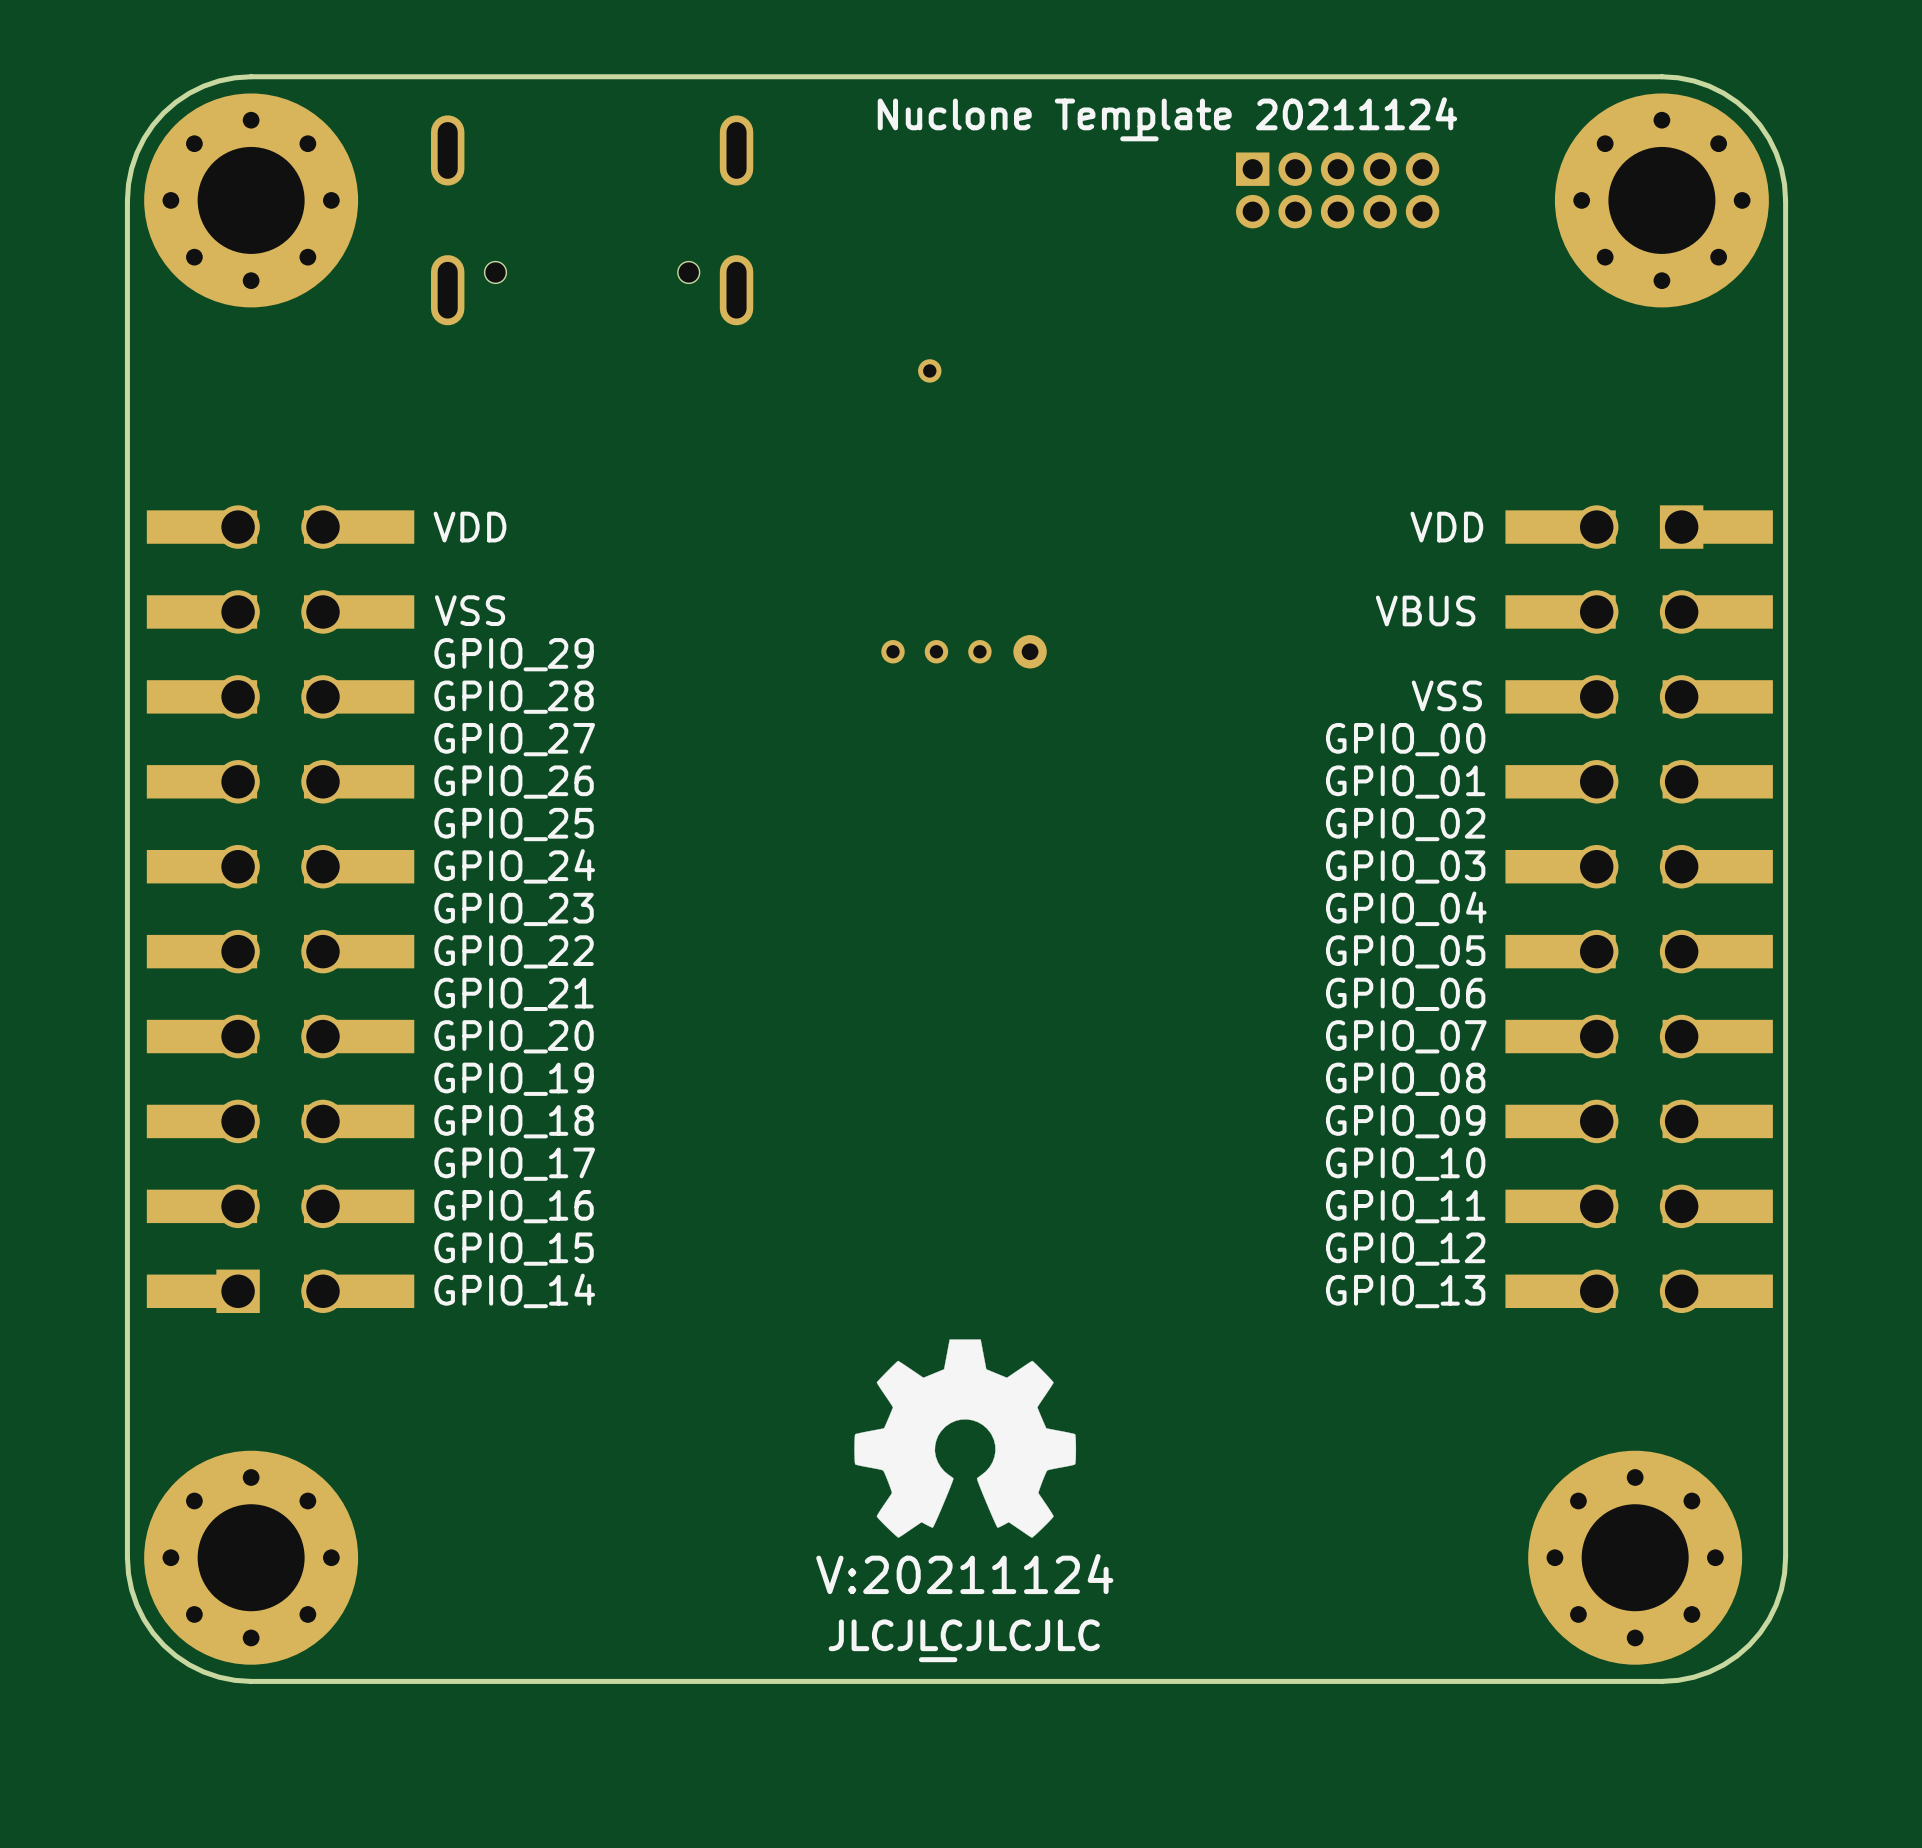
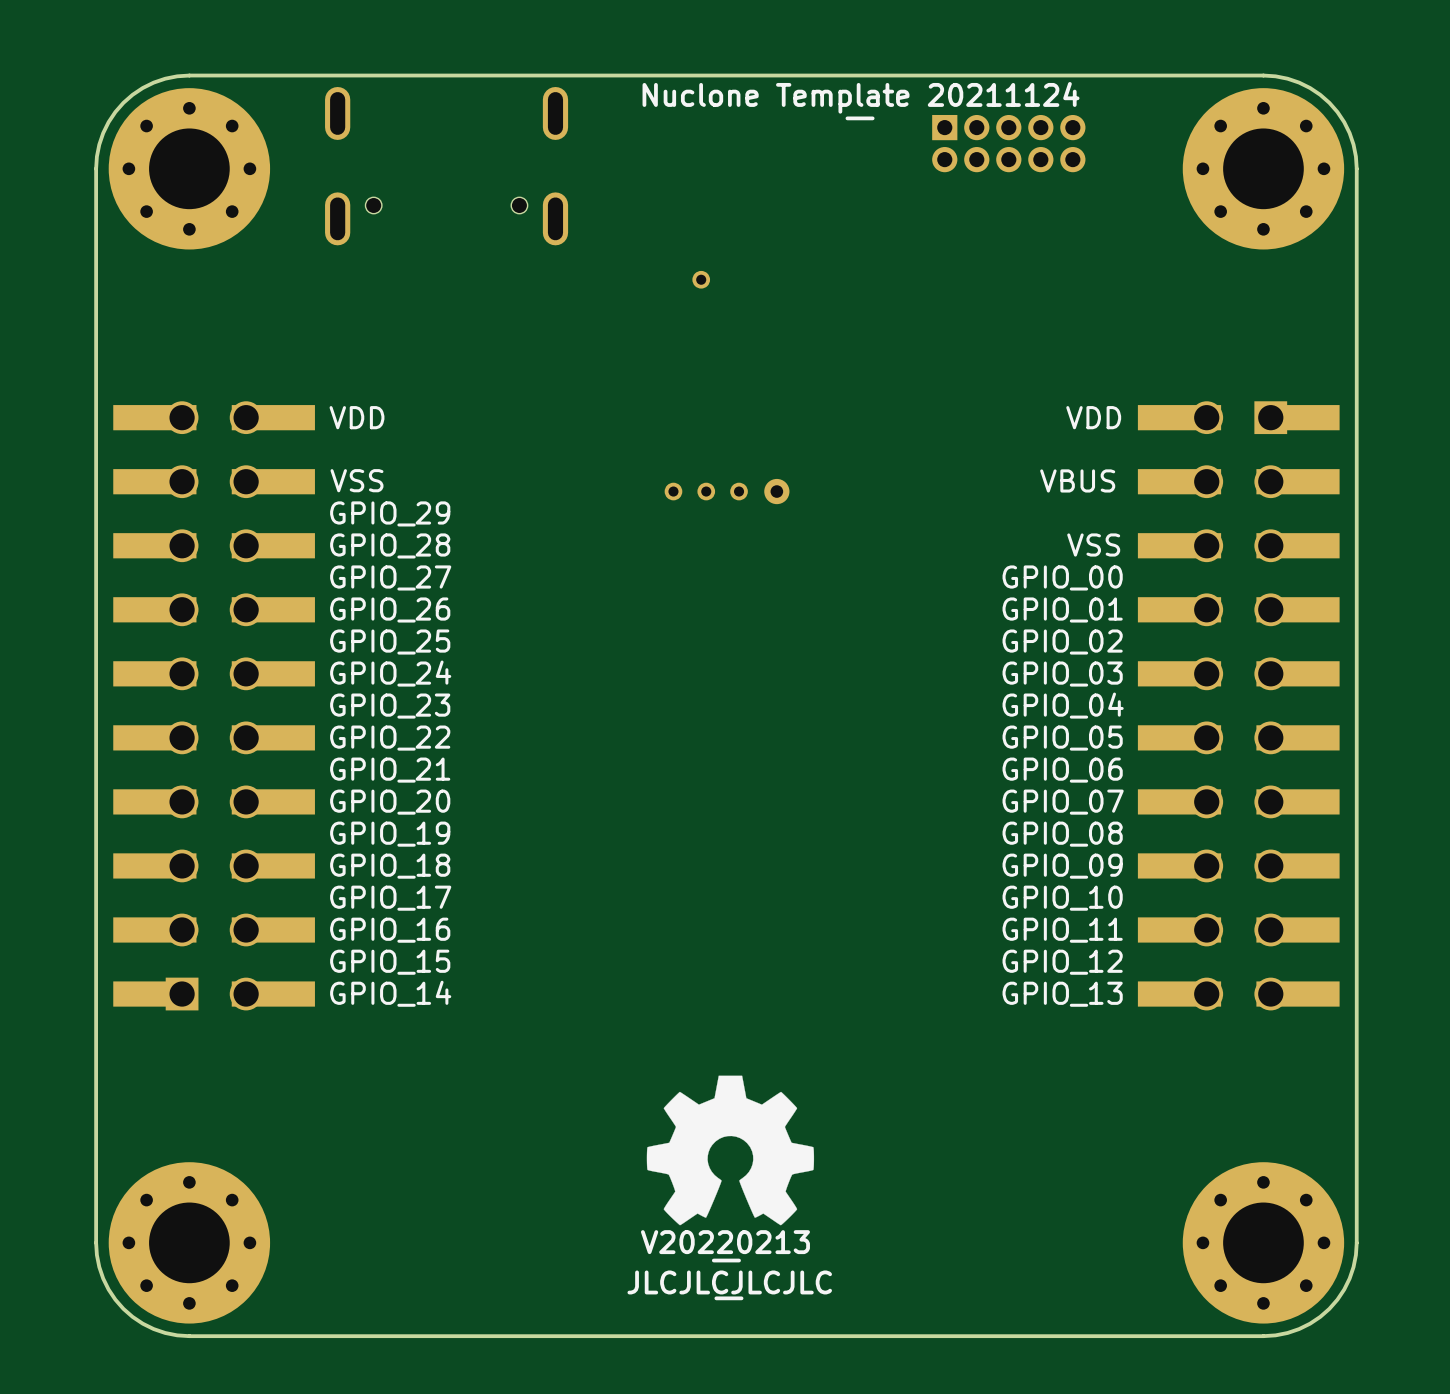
drawing shape: [877, 97, 1458, 142] -> [642, 82, 1080, 121]
part position: (251, 200) -> (189, 168)
part position: (1661, 200) -> (1263, 168)
board edge: (127, 223) (128, 184) (131, 168) (144, 138) (152, 125) (175, 102) (189, 93) (219, 80) (251, 76) (1678, 77) (1709, 86) (1723, 93) (1749, 112) (1769, 138) (1776, 153) (1781, 168) (1785, 200) (1785, 1557) (1784, 1573) (1776, 1605) (1760, 1633) (1737, 1655) (1723, 1664) (1693, 1677) (1661, 1681) (251, 1681) (219, 1677) (203, 1672) (189, 1664) (163, 1645) (144, 1619) (136, 1605) (131, 1589) (127, 1557) -> (96, 168) (99, 144) (103, 133) (108, 122) (123, 102) (142, 88) (153, 82) (165, 78) (189, 75) (1263, 75) (1287, 78) (1299, 82) (1320, 94) (1337, 112) (1349, 133) (1353, 144) (1356, 168) (1356, 1242) (1353, 1267) (1349, 1278) (1344, 1289) (1329, 1308) (1310, 1323) (1299, 1329) (1275, 1335) (189, 1336) (165, 1332) (142, 1323) (123, 1308) (108, 1289) (103, 1278) (96, 1255) (96, 1174)
part position: (280, 909) -> (214, 705)
part position: (1639, 909) -> (1238, 705)
drawing position: (965, 1438) -> (730, 1150)
drawing: [816, 1554, 1114, 1595] -> none
part position: (251, 1557) -> (189, 1242)
part position: (1635, 1557) -> (1263, 1242)
drawing shape: [828, 1619, 1100, 1663] -> [640, 1230, 810, 1263]
drawing: none -> [714, 1296, 744, 1301]

